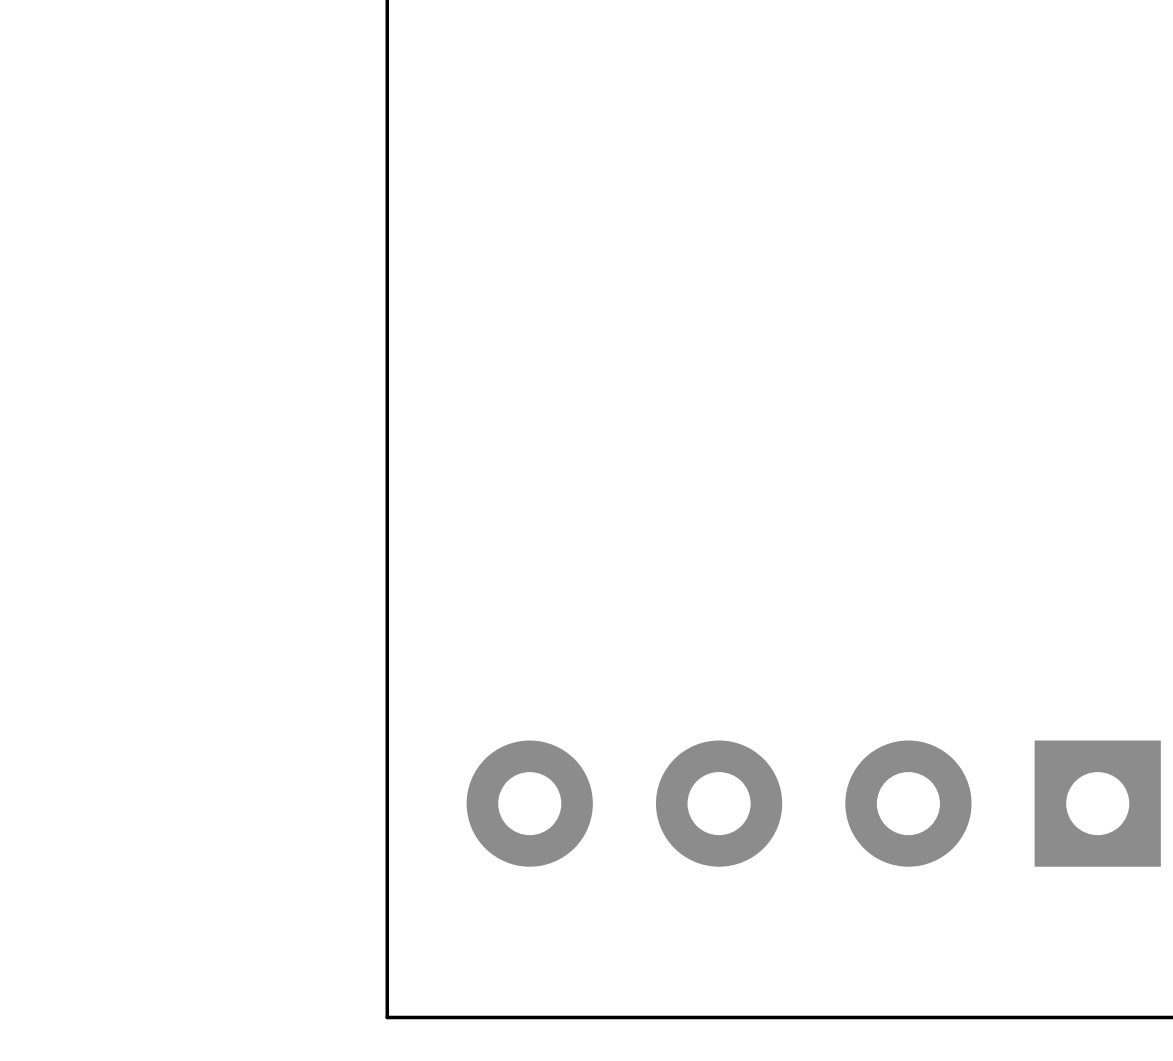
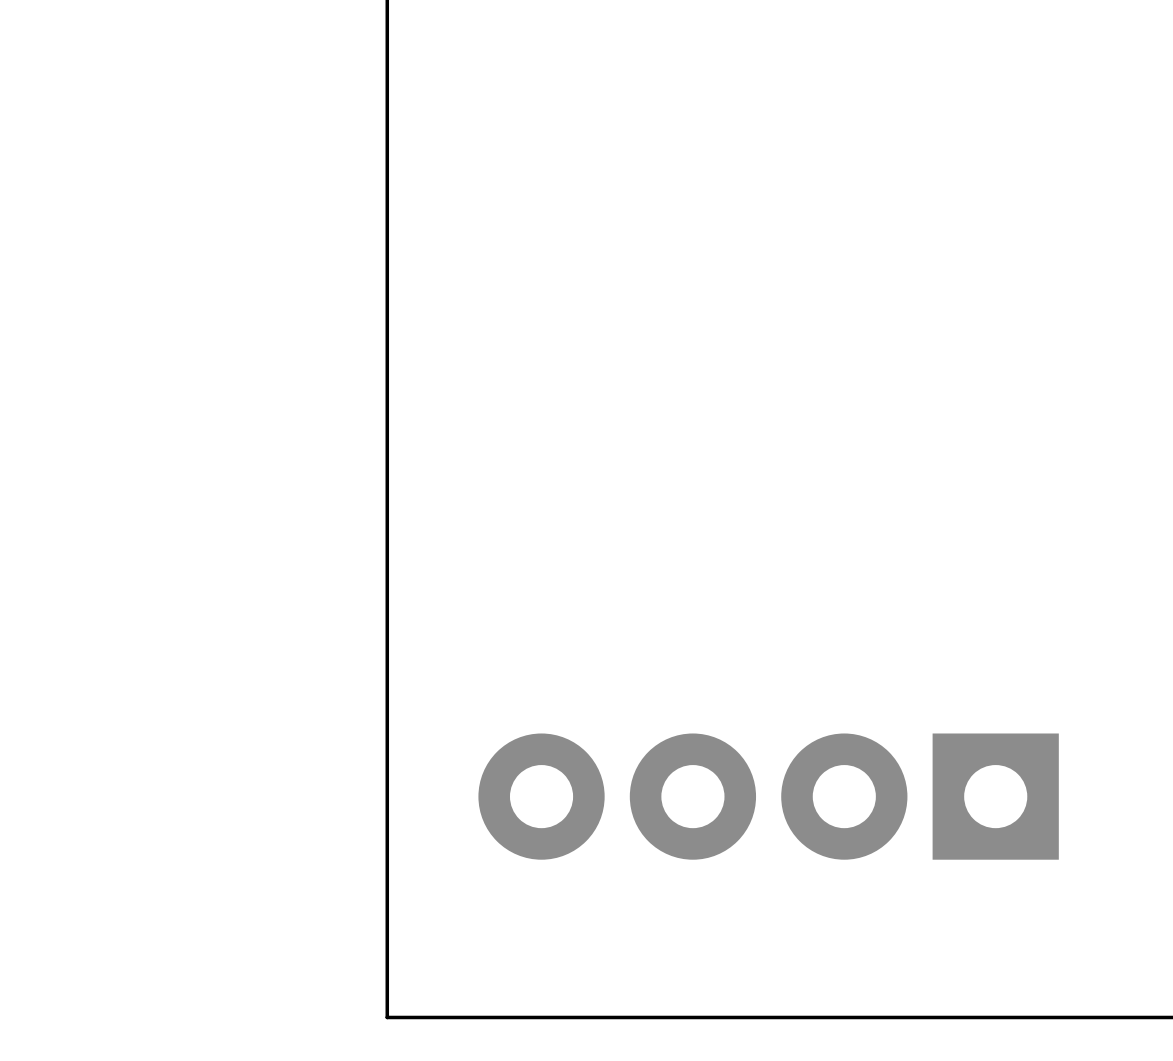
part footprint: [466, 740, 1161, 867] -> [478, 733, 1059, 860]

